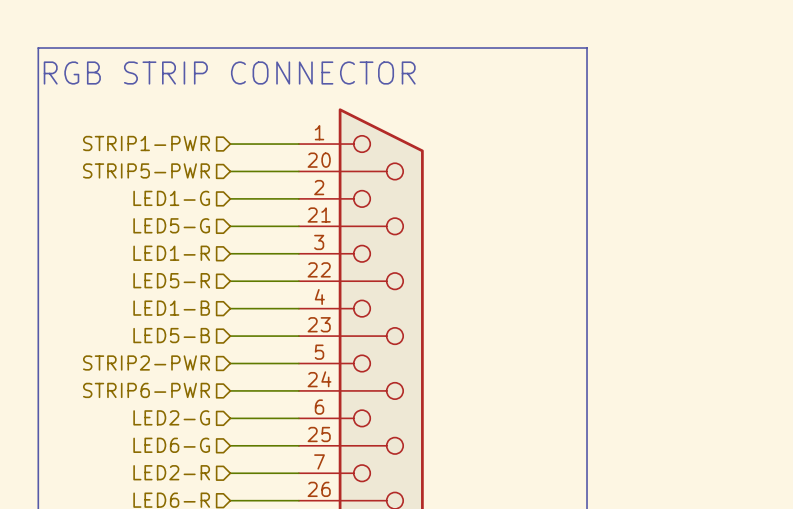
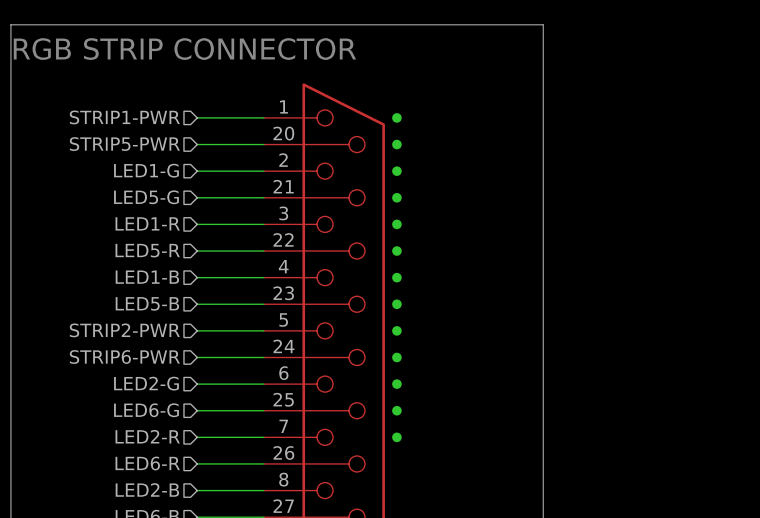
junction: none -> (396, 117)
junction: none -> (396, 144)
junction: none -> (396, 171)
junction: none -> (396, 197)
junction: none -> (396, 224)
junction: none -> (396, 251)
junction: none -> (396, 277)
junction: none -> (396, 304)
junction: none -> (396, 330)
junction: none -> (396, 357)
junction: none -> (396, 384)
junction: none -> (396, 410)
junction: none -> (396, 437)

